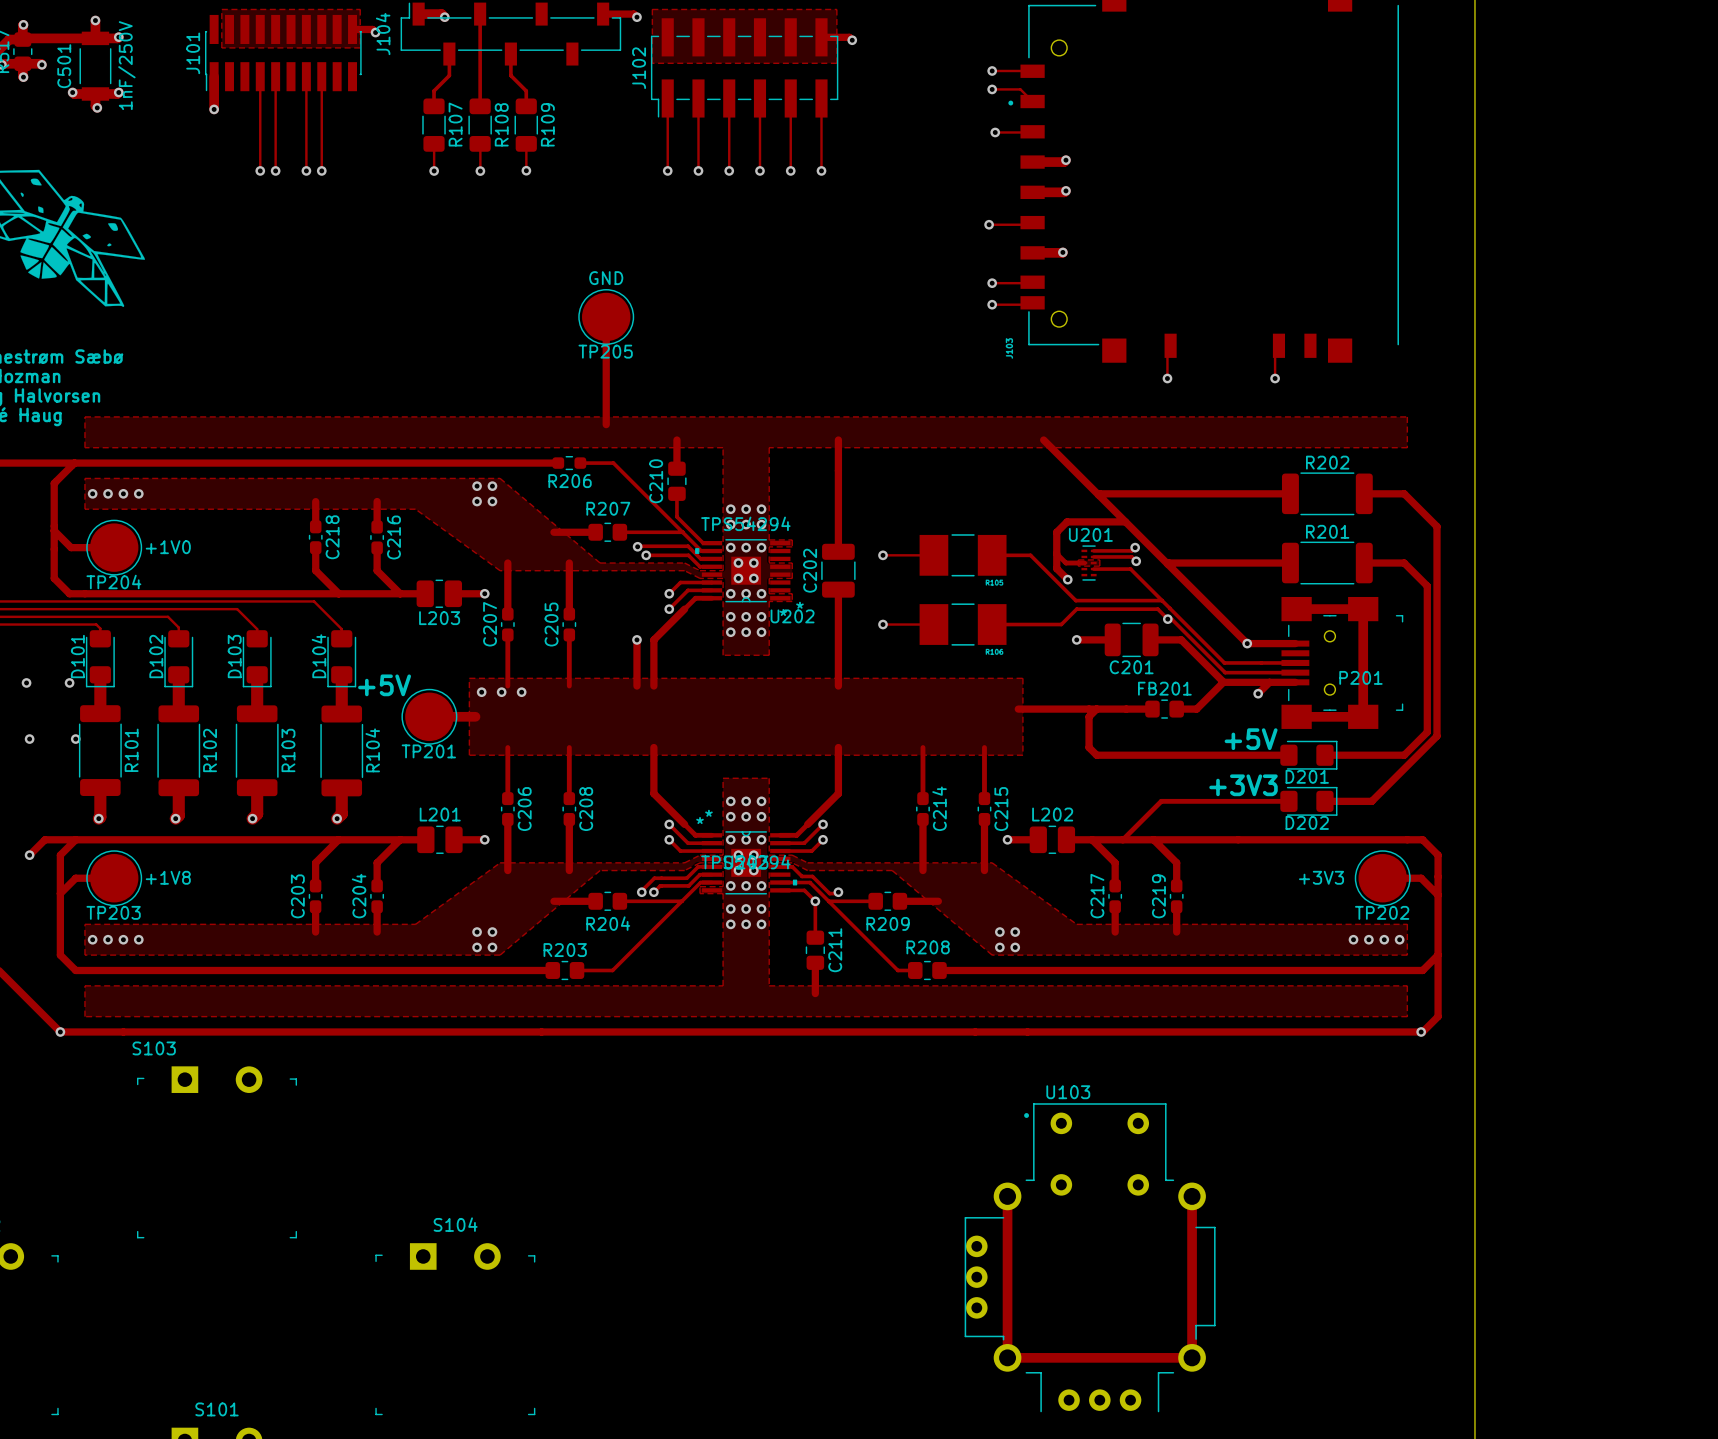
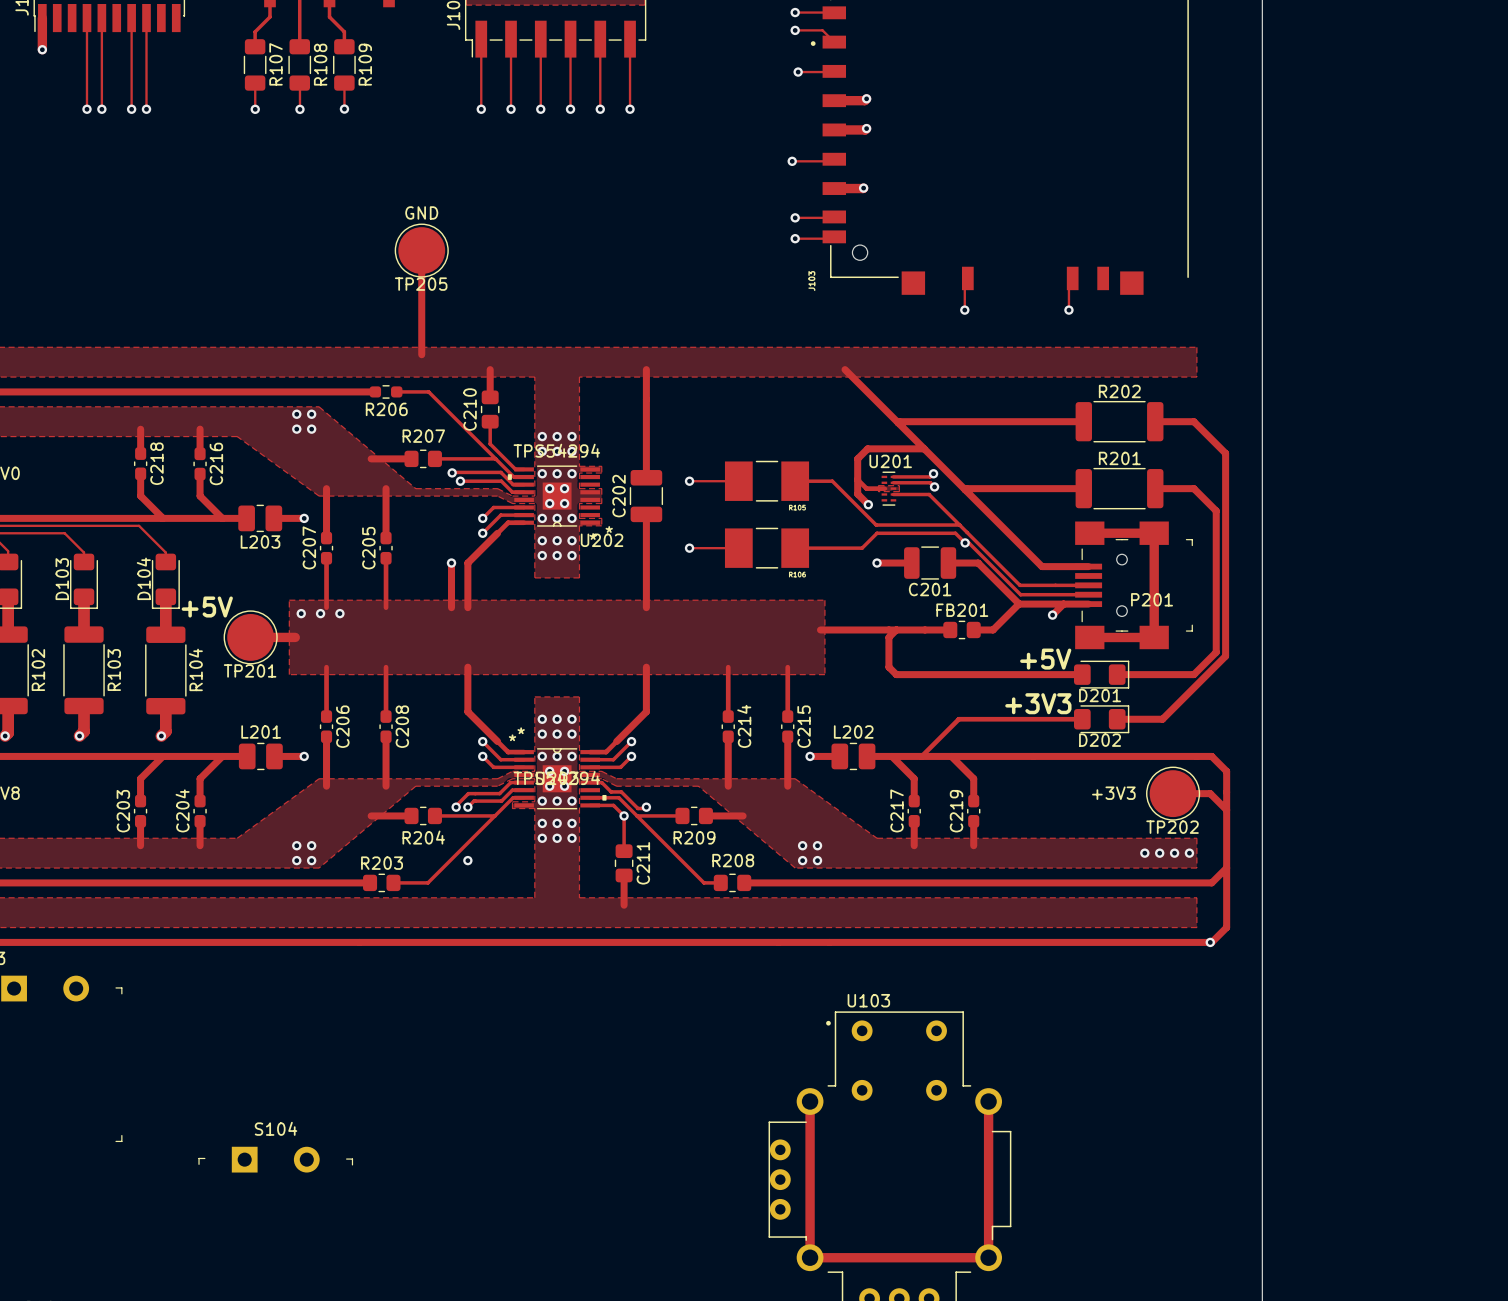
via: (1247, 643) -> none
via: none -> (467, 860)

